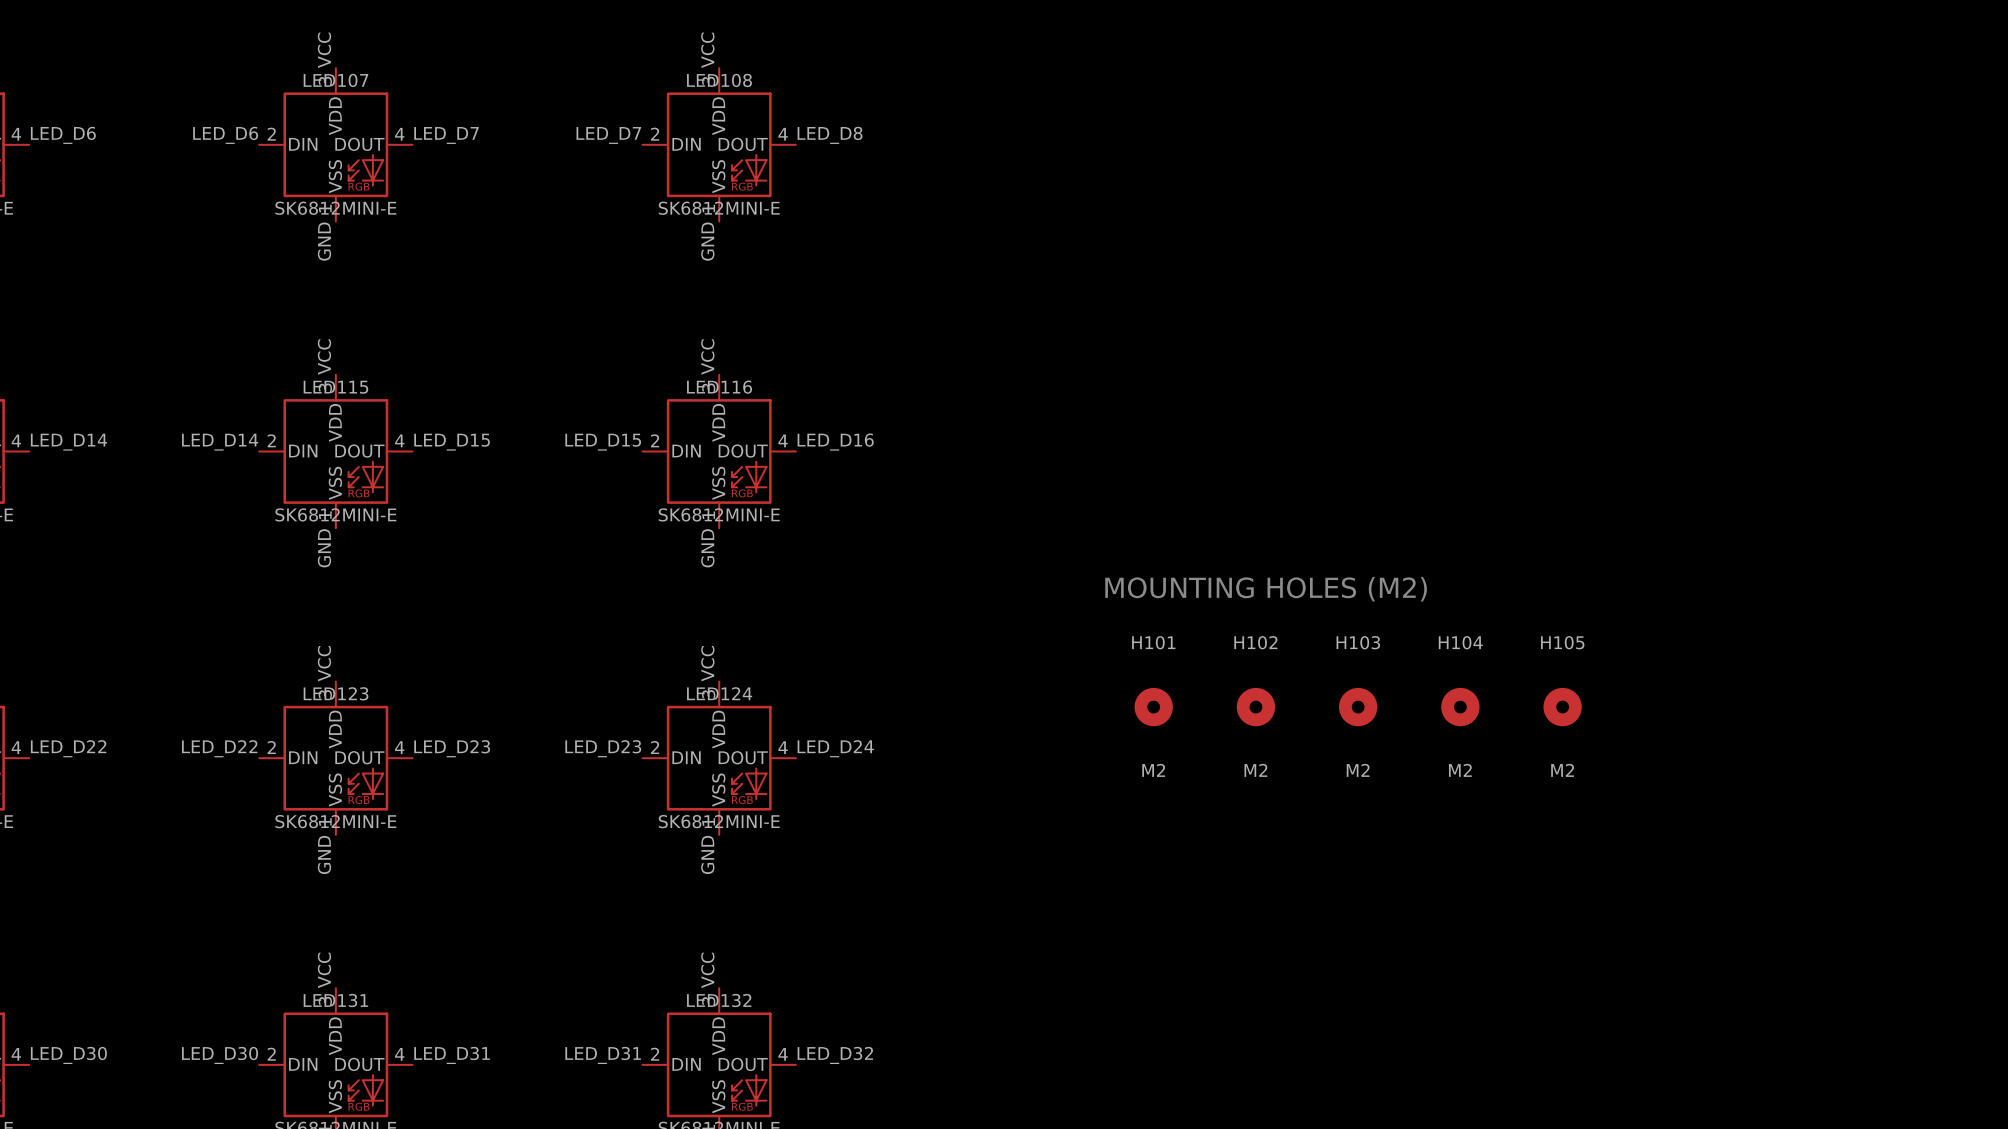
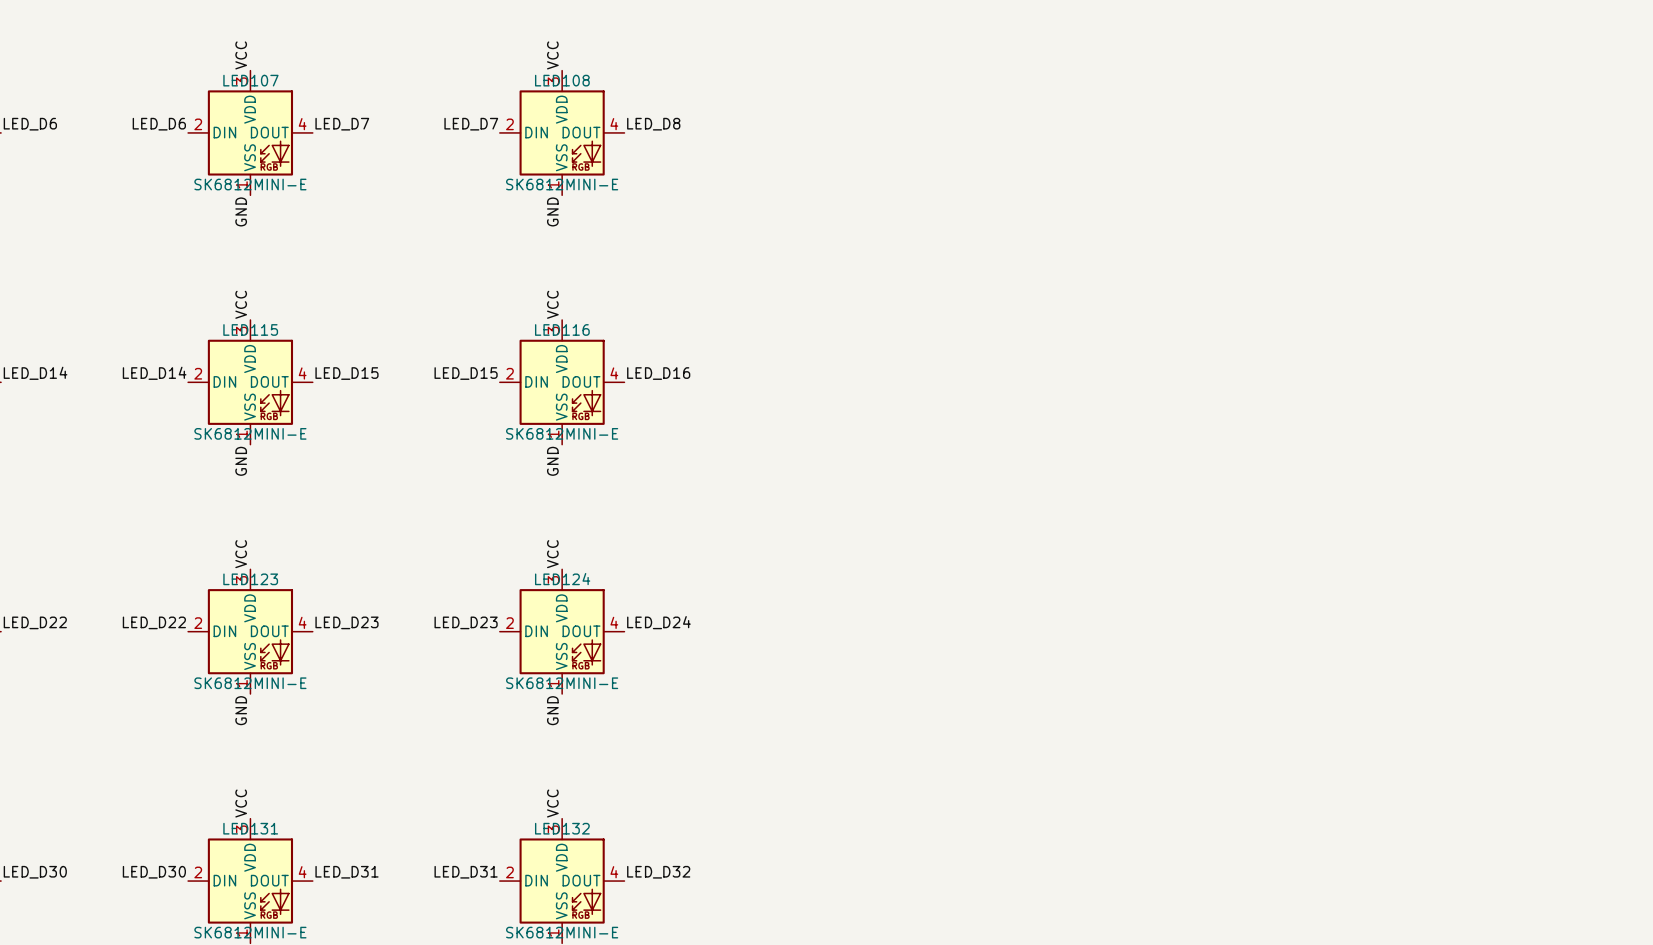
text: MOUNTING HOLES (M2) (1266, 589) -> none
H101: M2 (1153, 707) -> none
H102: M2 (1255, 707) -> none
H103: M2 (1358, 707) -> none
H104: M2 (1460, 707) -> none
H105: M2 (1562, 707) -> none

